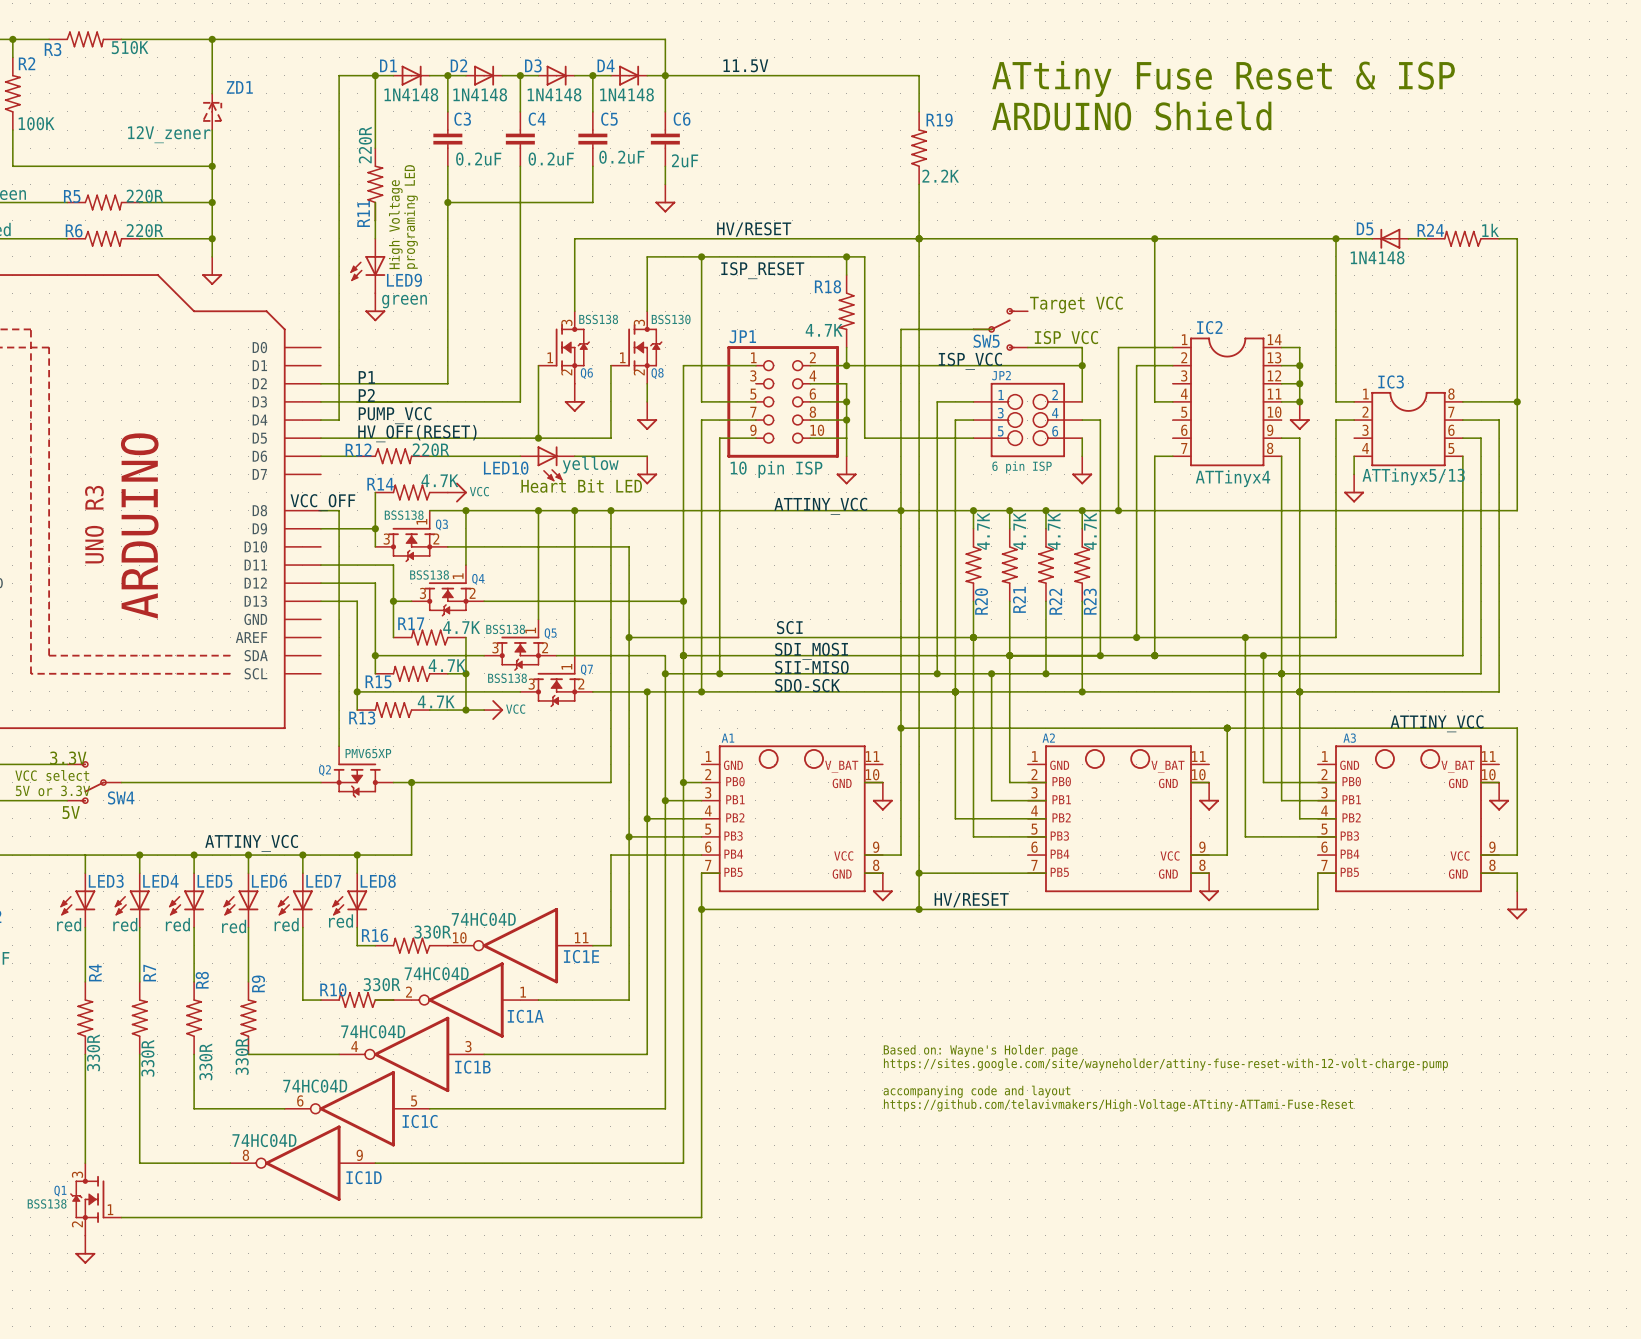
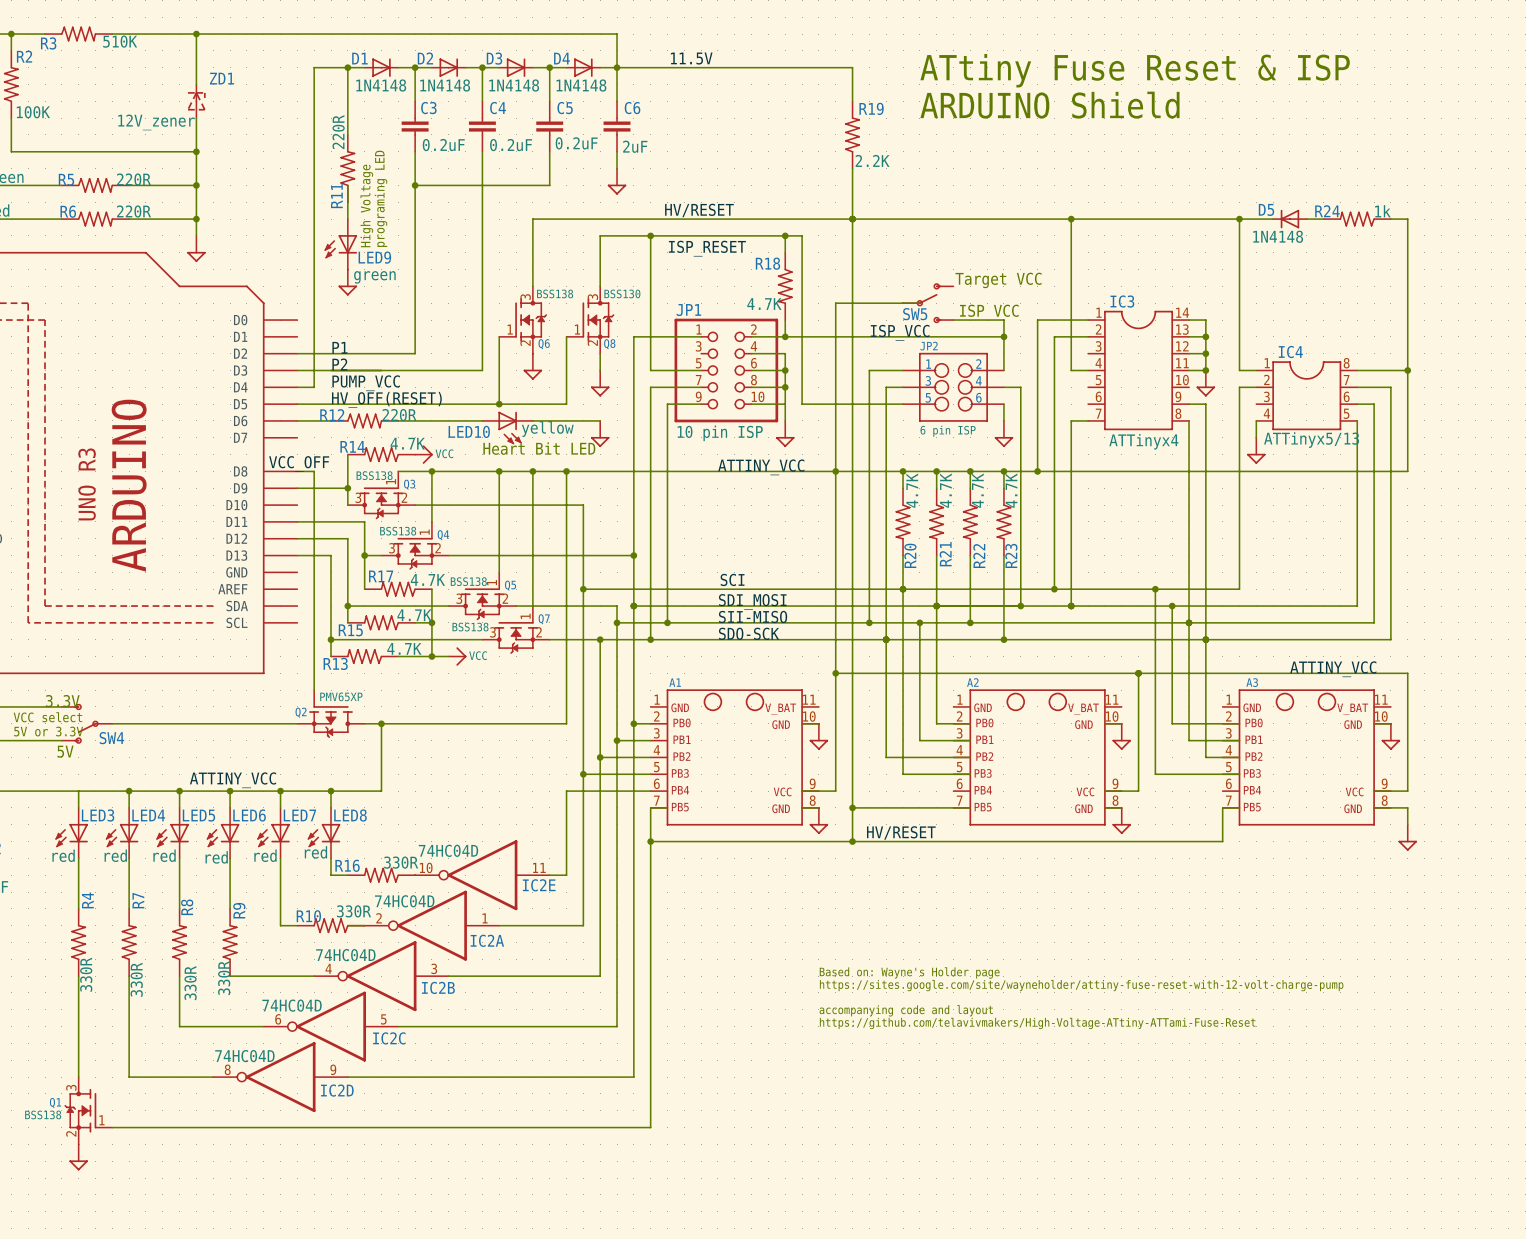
IC2 name: IC2 (1209, 327) -> IC3 (1122, 301)
IC3 name: IC3 (1391, 381) -> IC4 (1290, 352)
IC1E name: IC1E (581, 956) -> IC2E (539, 885)
IC1A name: IC1A (525, 1016) -> IC2A (487, 940)
IC1B name: IC1B (472, 1067) -> IC2B (438, 987)
IC1C name: IC1C (420, 1121) -> IC2C (389, 1038)
IC1D name: IC1D (364, 1177) -> IC2D (337, 1090)

